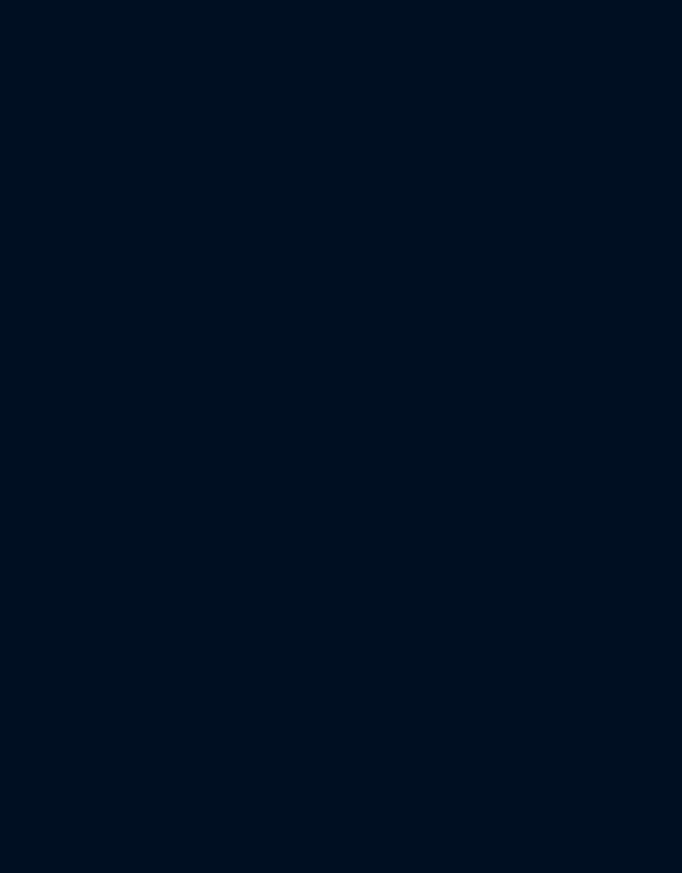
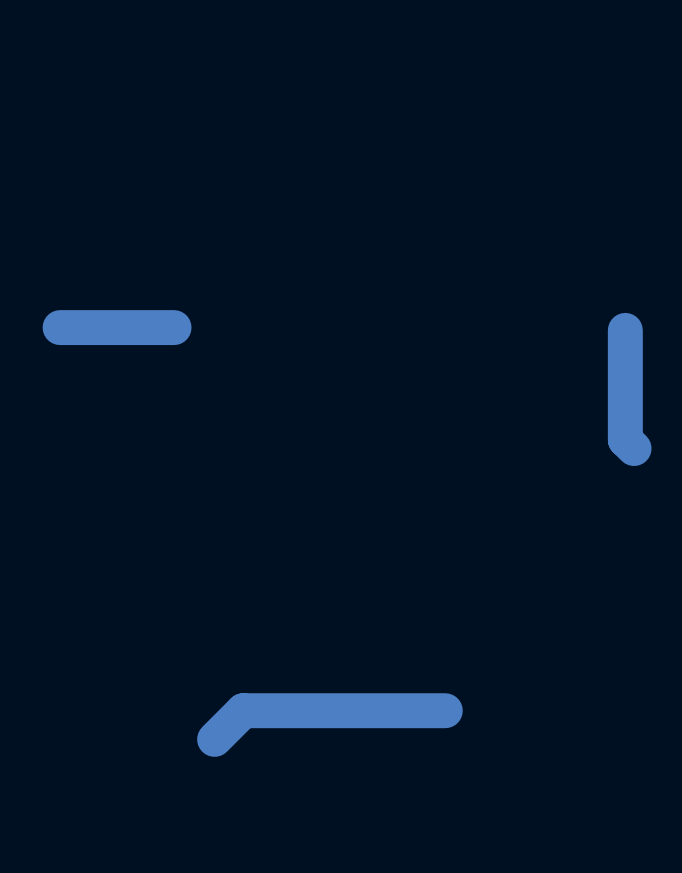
bottom track: none -> (174, 327) (60, 327)
bottom track: none -> (625, 330) (625, 439) (634, 448)
bottom track: none -> (445, 710) (243, 710) (214, 739)

